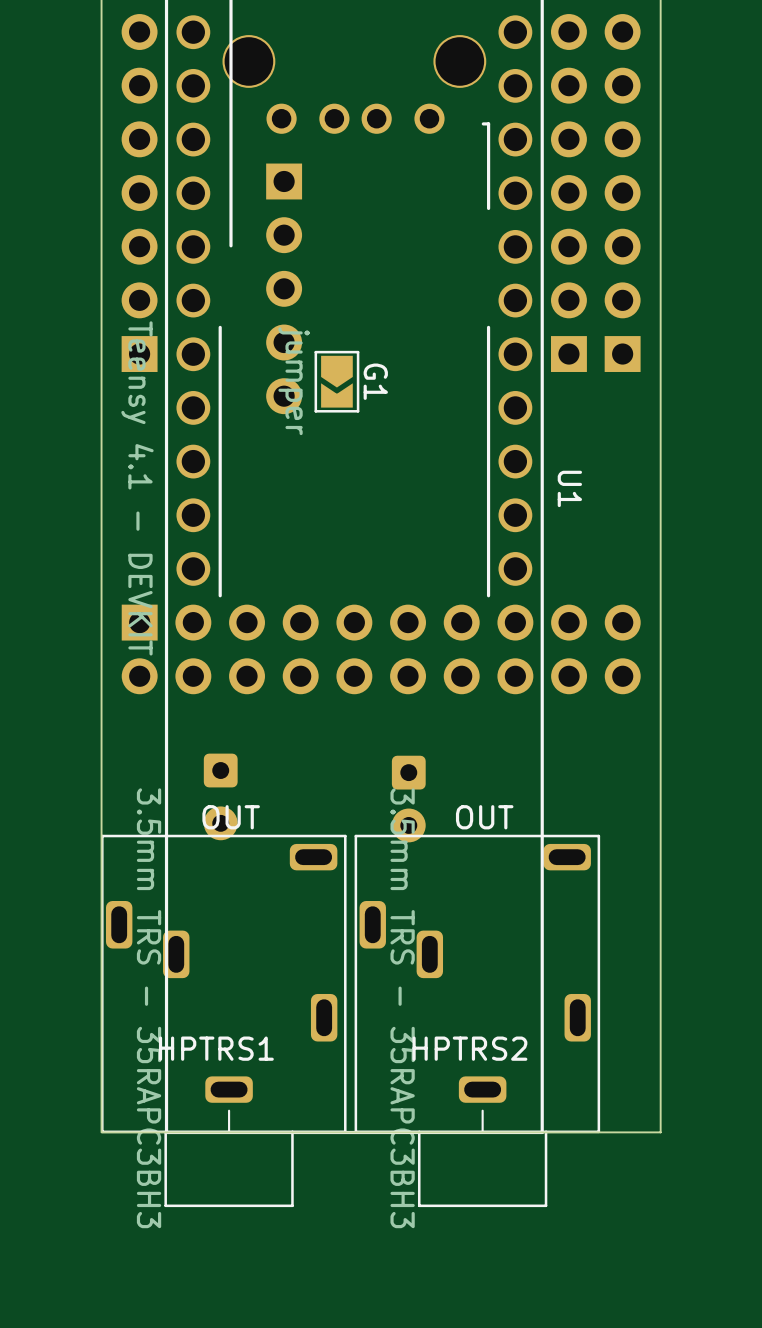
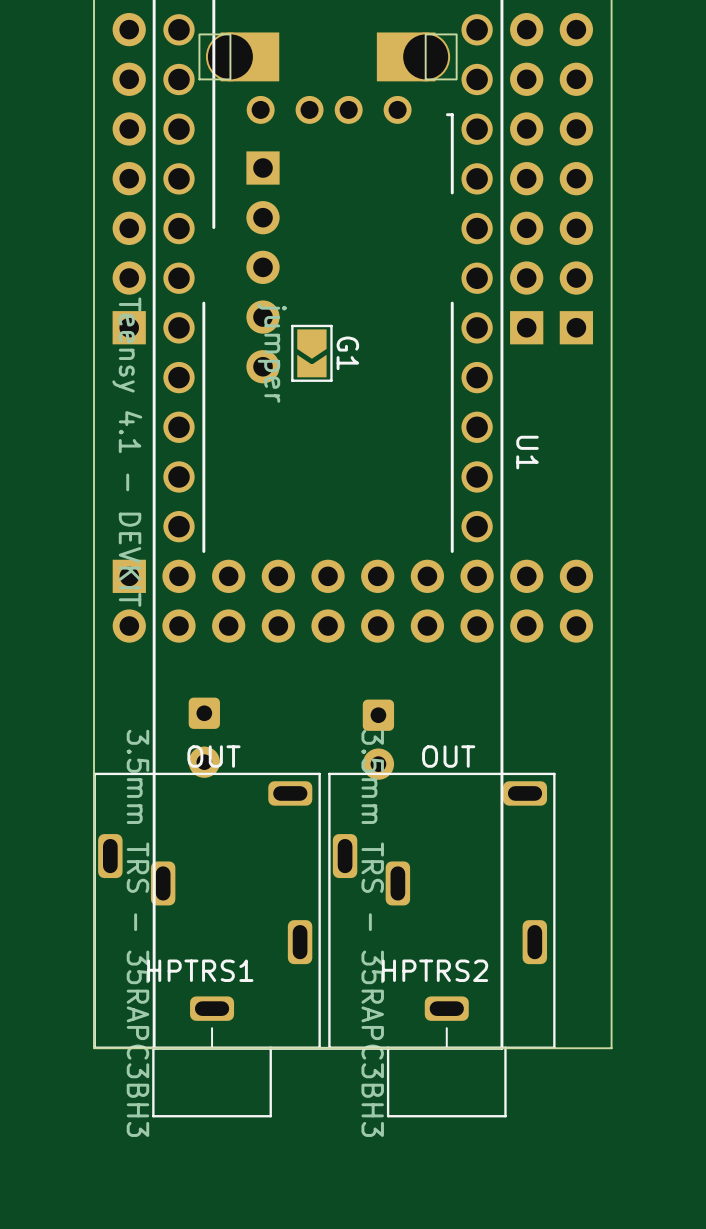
part footprint: [222, 35, 487, 134] -> [198, 32, 458, 124]

